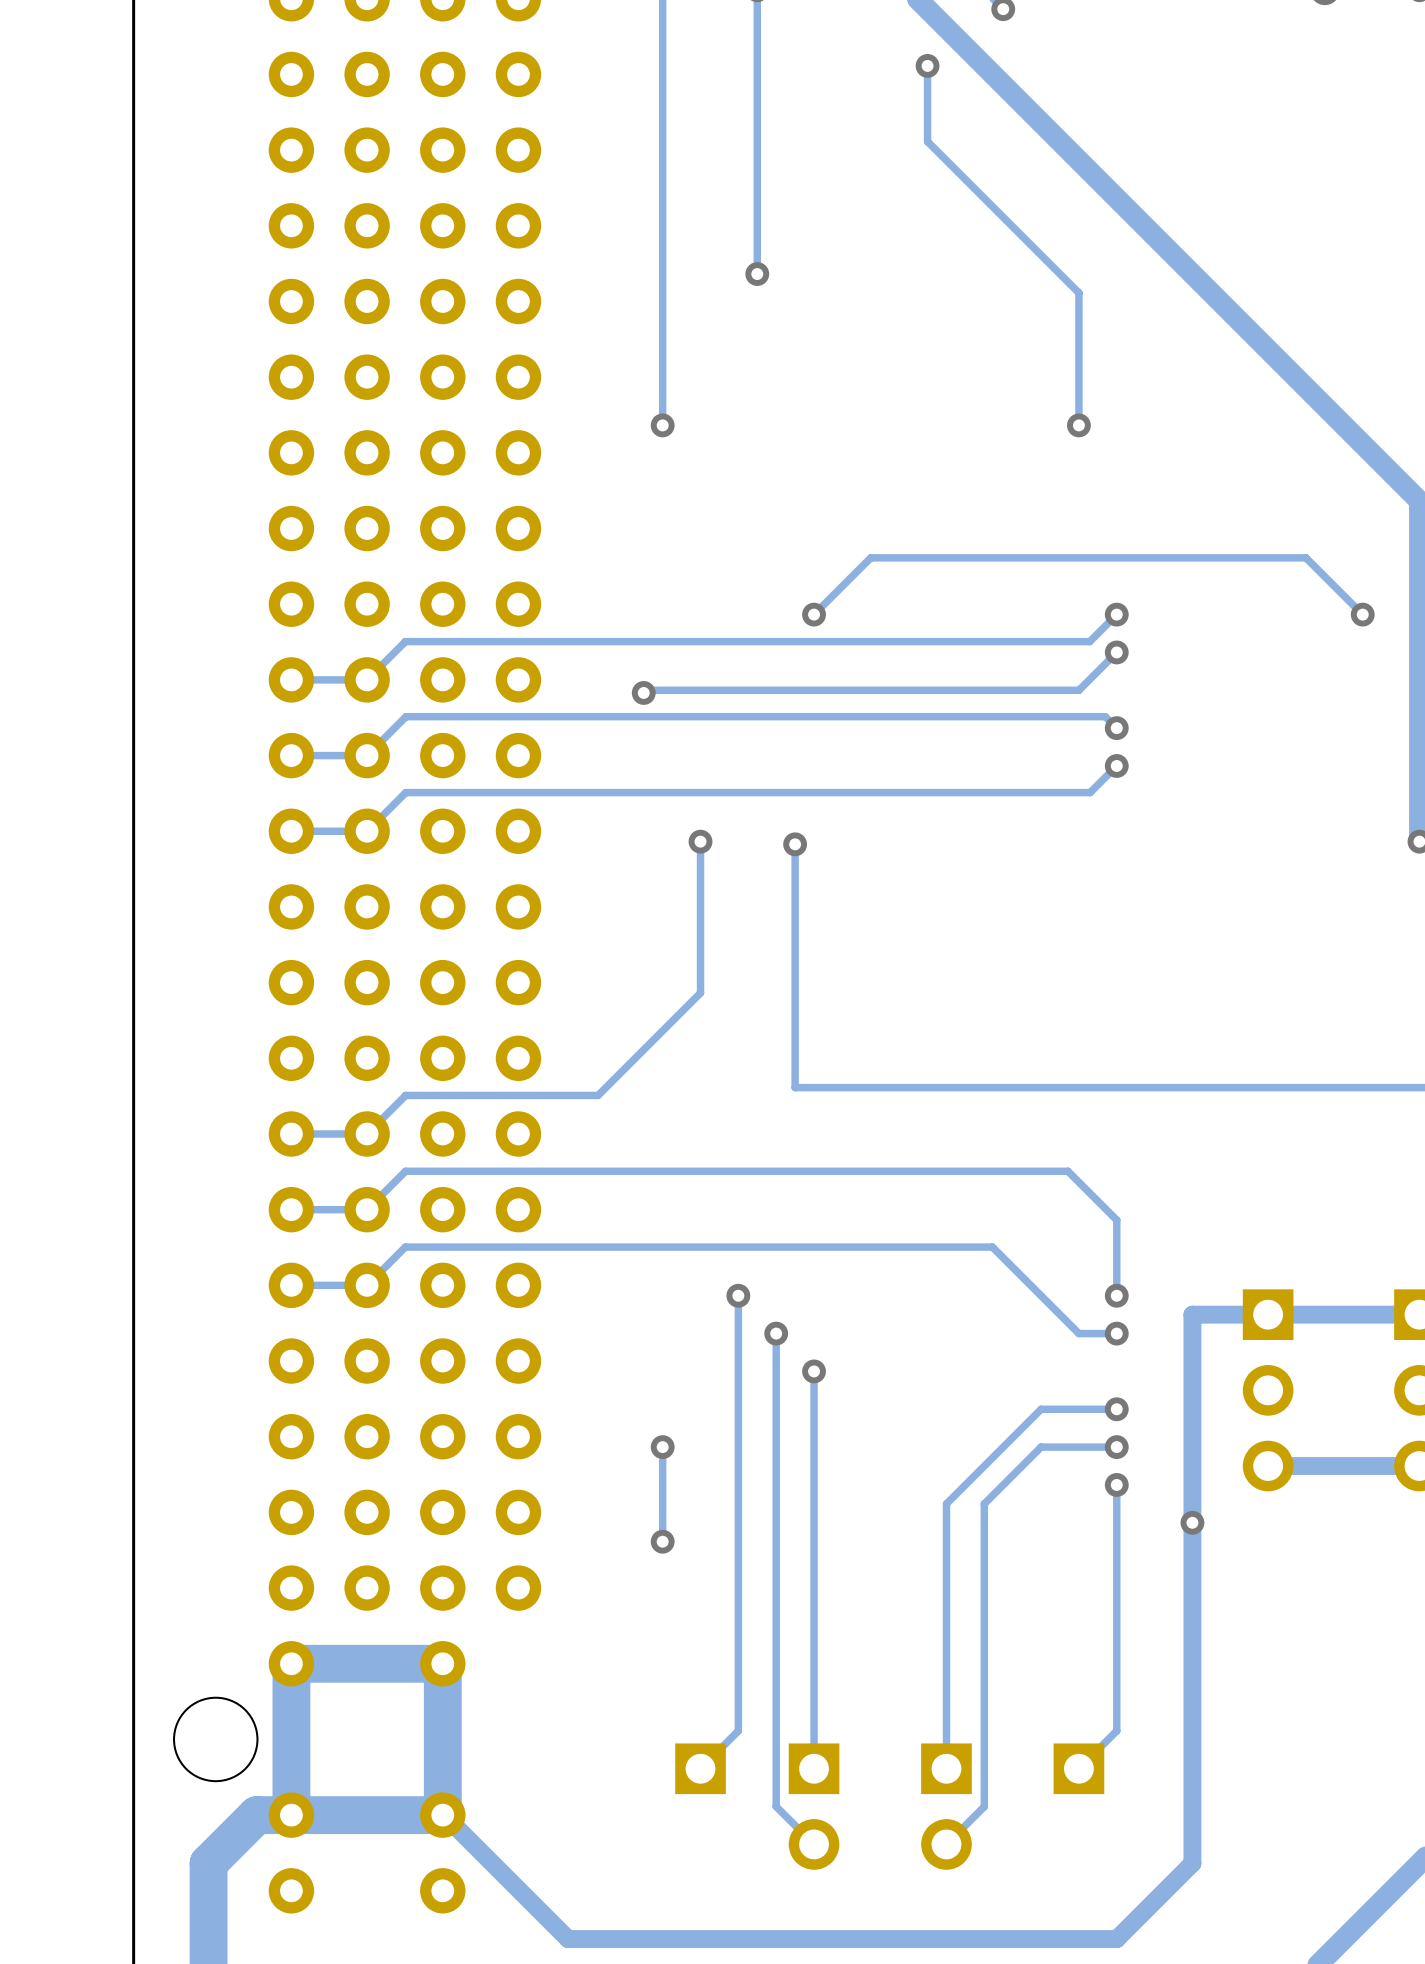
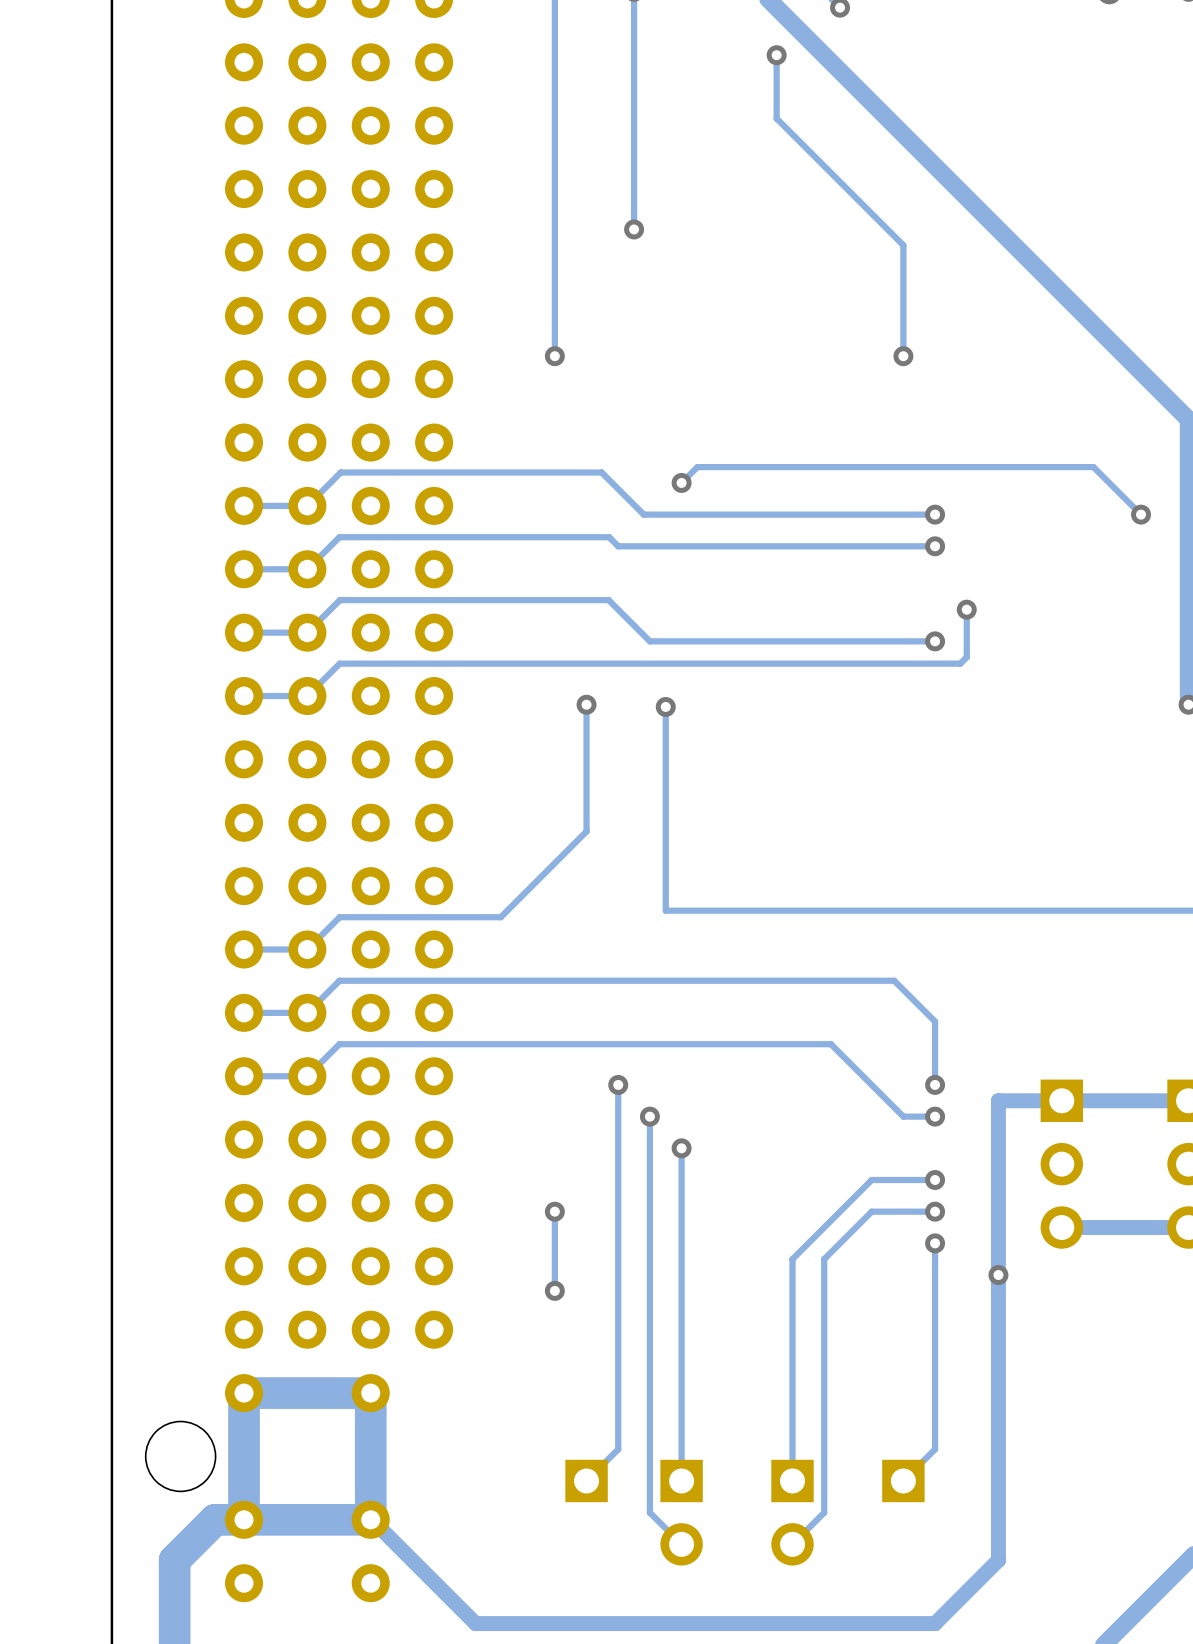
track: (870, 557) (814, 614) -> (729, 467) (697, 467) (681, 482)
track: none -> (244, 505) (307, 505) (340, 472) (601, 472) (643, 514) (935, 514)
via position: (814, 614) -> (681, 482)
track: (1116, 614) (1089, 641) (727, 641) -> (935, 546) (618, 546) (609, 537)
track: (1116, 652) (1078, 690) (646, 690) (643, 692) -> none
via: (643, 692) -> none
track: (726, 716) (1105, 716) (1116, 728) -> (608, 600) (649, 641) (935, 641)
via position: (1116, 728) -> (966, 609)
track: (1116, 765) (1090, 792) -> (966, 609) (966, 657) (960, 663) (912, 663)

